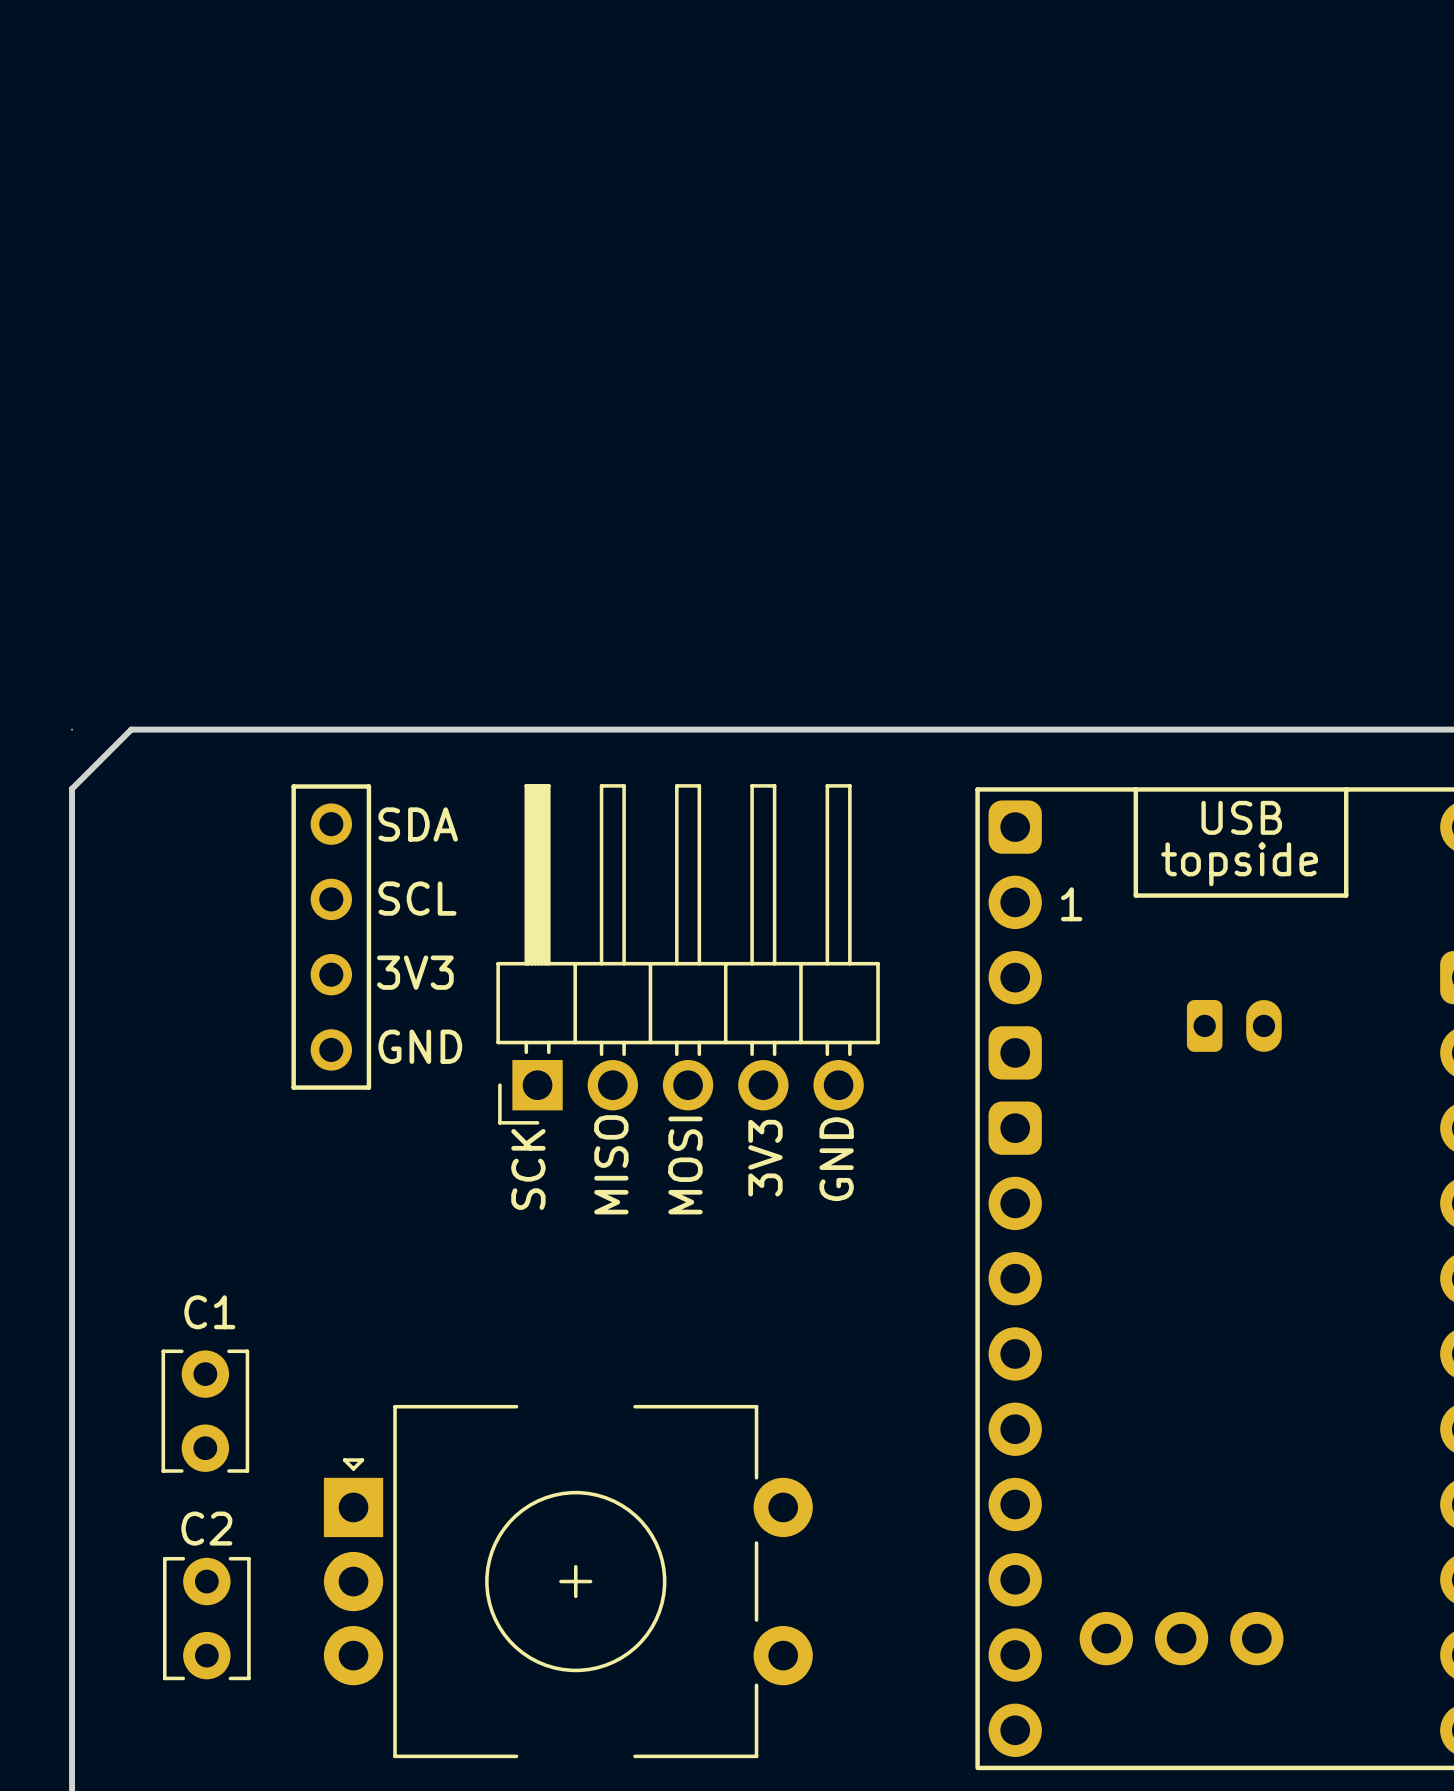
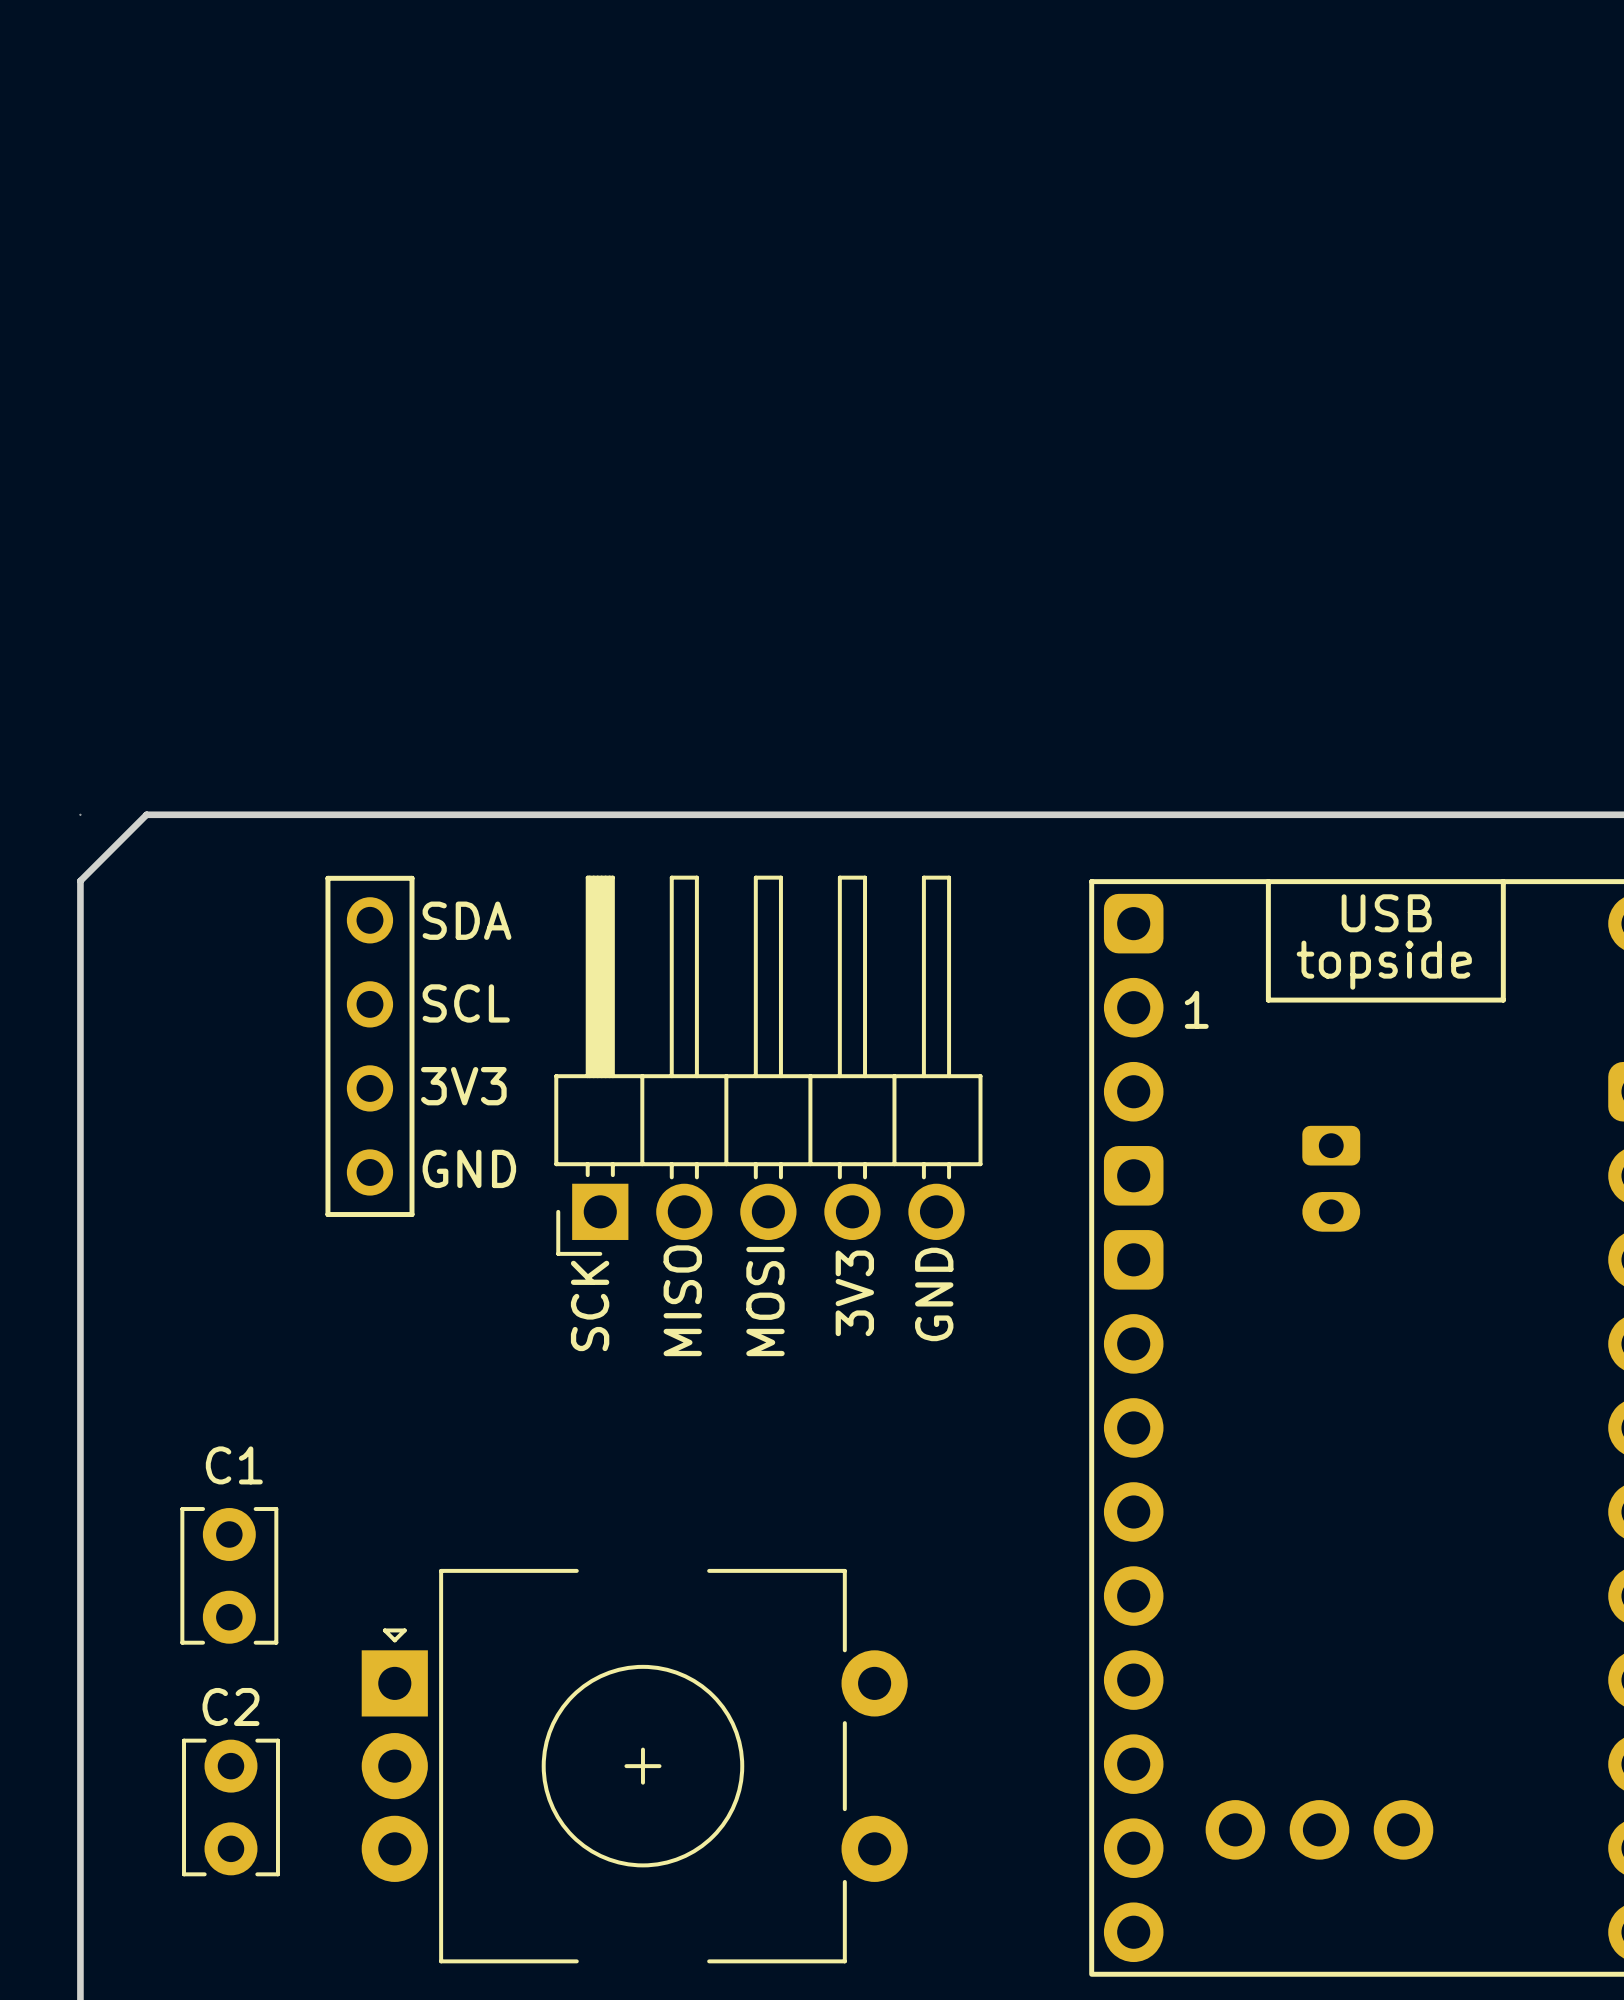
part rotation: 0° (1234, 1025) -> 90° clockwise (1331, 1178)

